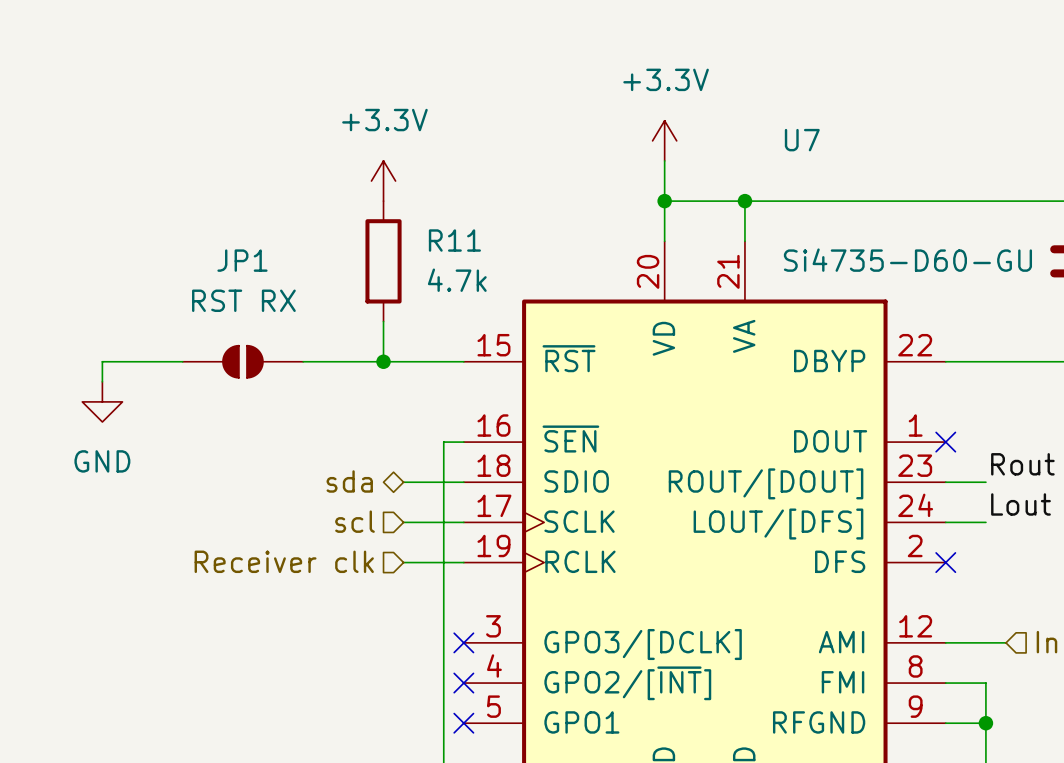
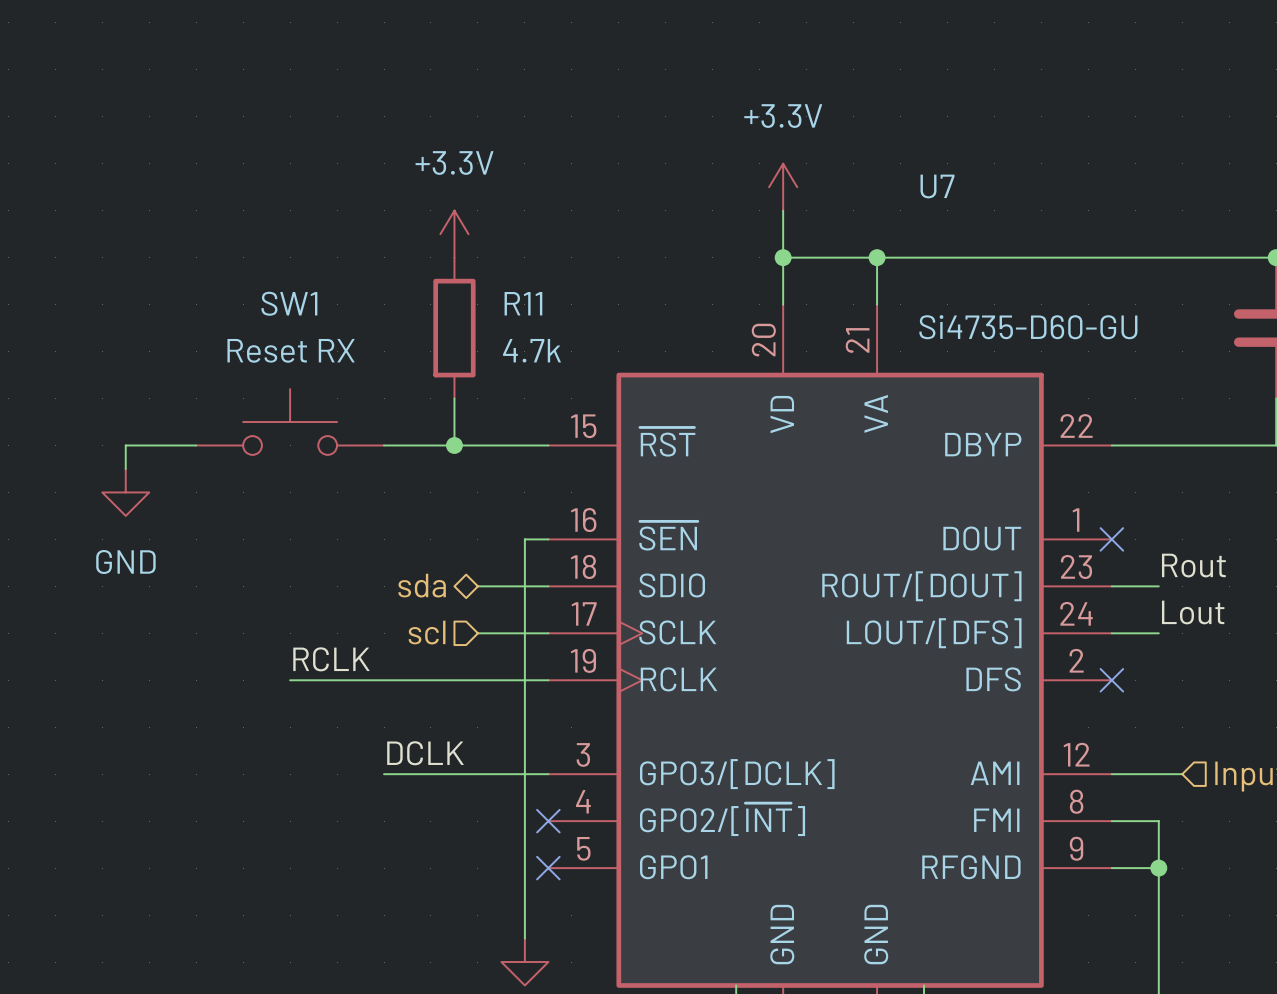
SW1: none -> Reset RX (290, 422)
JP1: RST RX (242, 361) -> none
label: none -> RCLK (331, 659)
hierarchical label: Receiver clk (284, 561) -> none
wire: none -> (290, 680) (477, 680)
label: none -> DCLK (425, 753)
wire: none -> (384, 774) (548, 774)
no-connect mark: (463, 642) -> none

